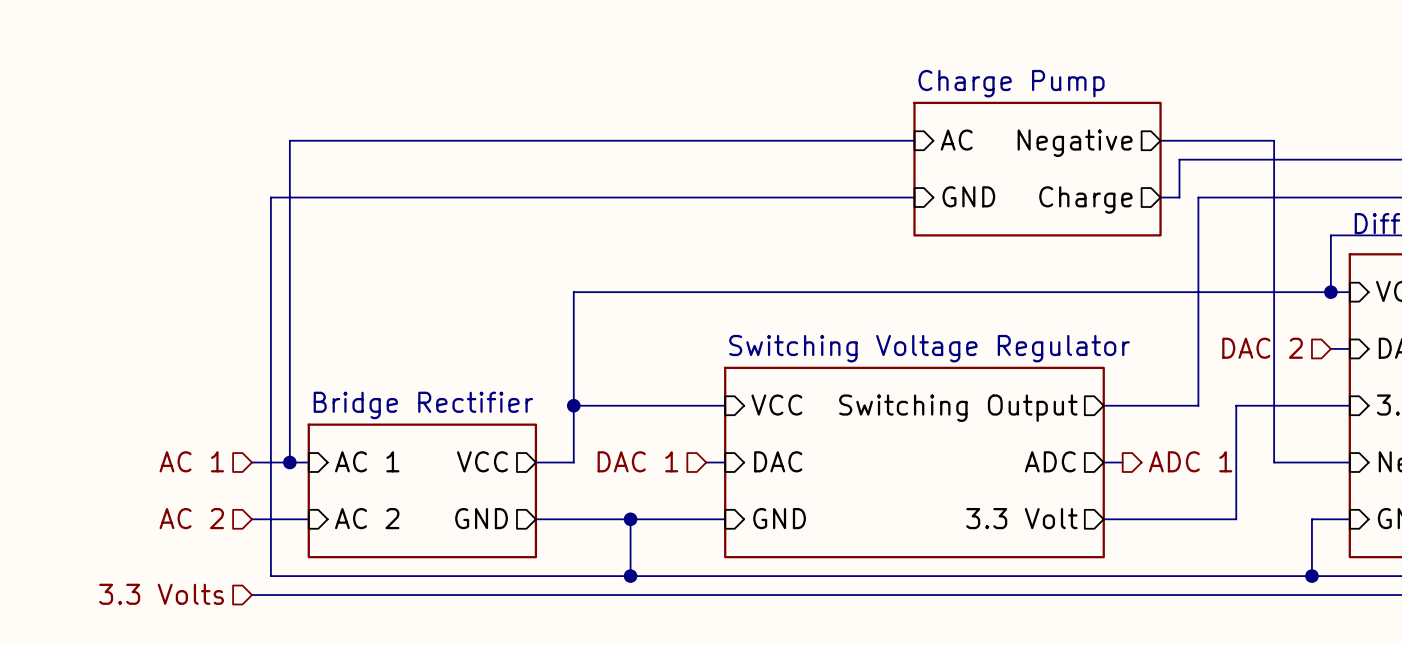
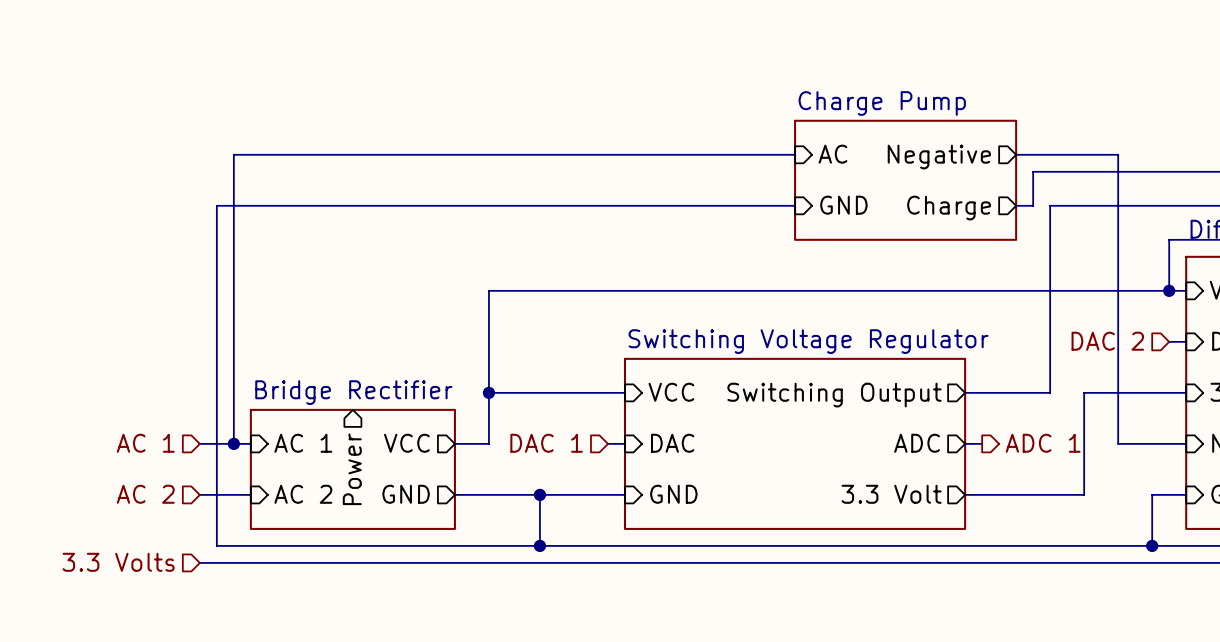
sheet pin: none -> Power (352, 469)

